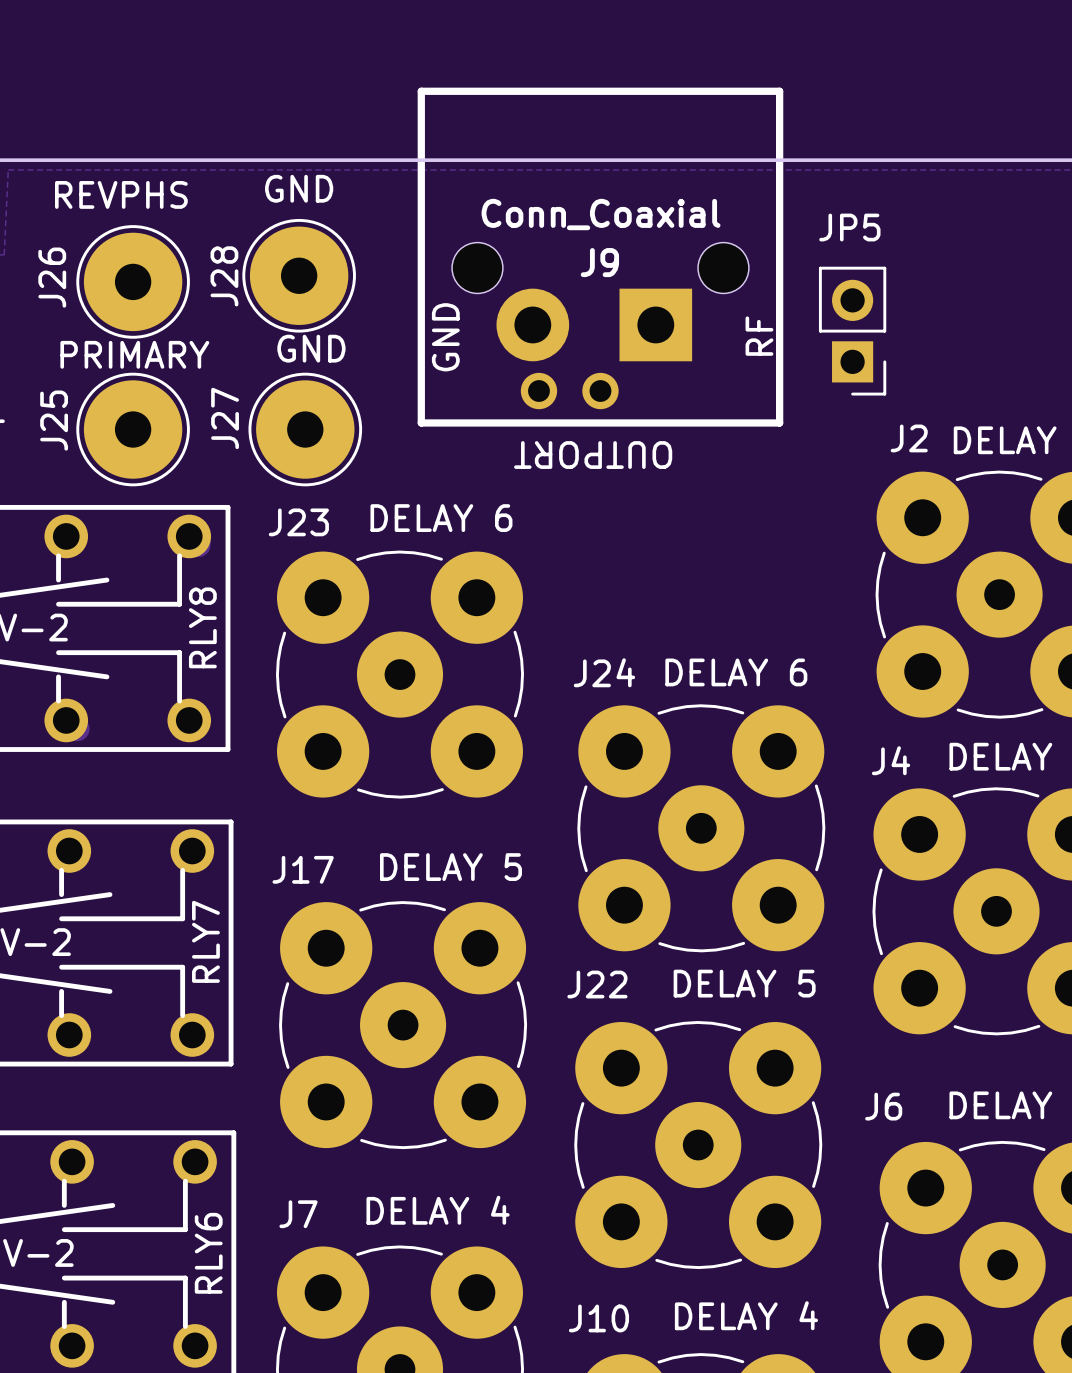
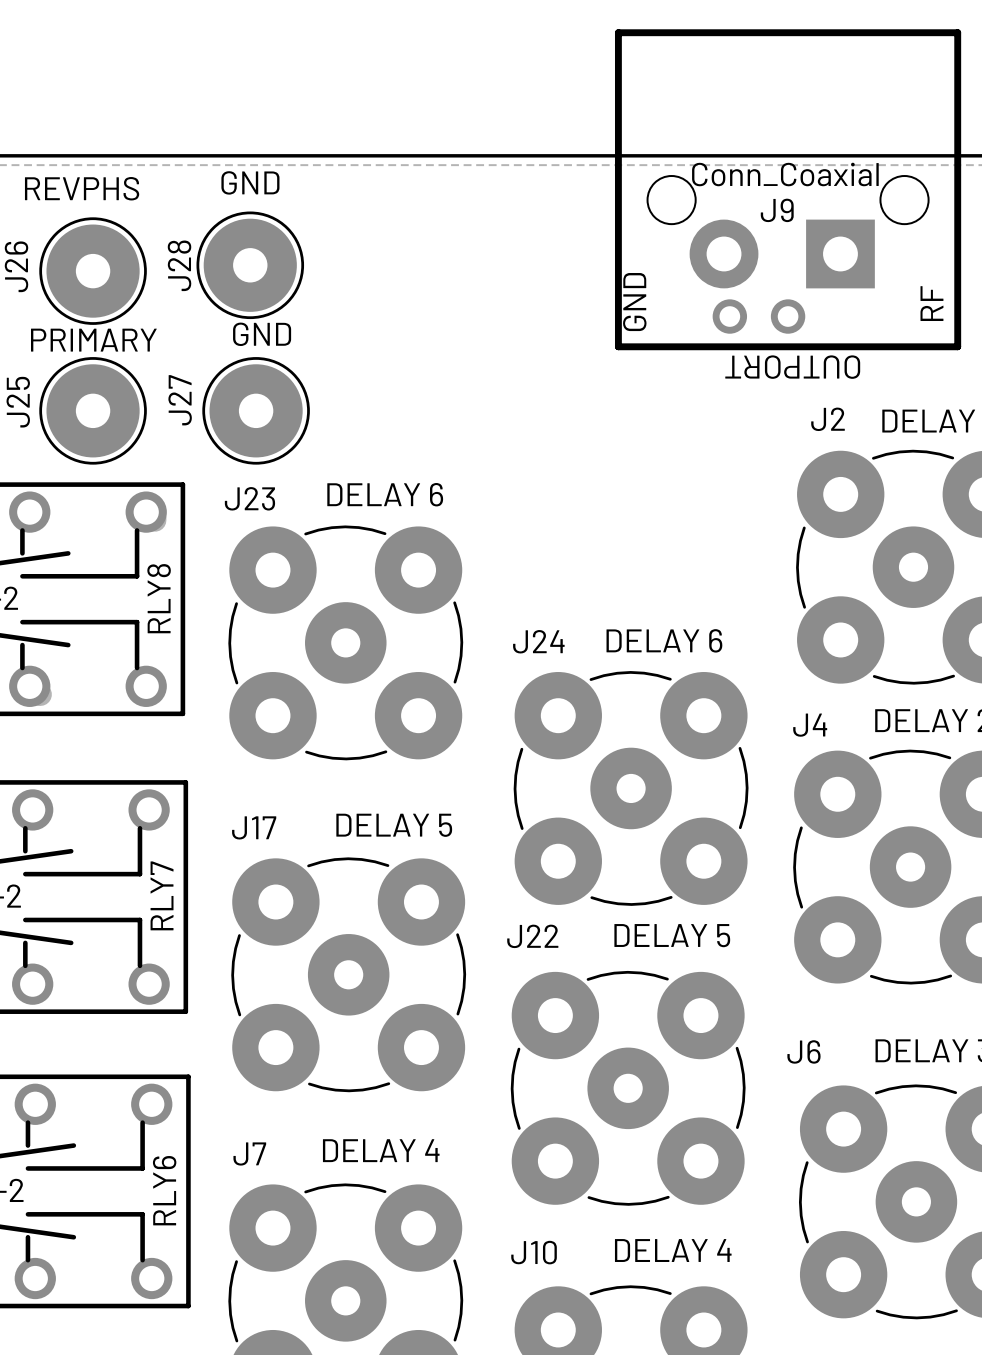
J9 value position: Conn_Coaxial (601, 214) -> Conn_Coaxial (785, 174)
J9 position: (600, 257) -> (788, 189)
J9 name position: J9 (599, 262) -> J9 (777, 210)
JP5: (852, 331) -> none
text position: RF (759, 336) -> RF (931, 303)
text position: GND (445, 337) -> GND (634, 302)
text position: OUTPORT (593, 455) -> OUTPORT (792, 367)

